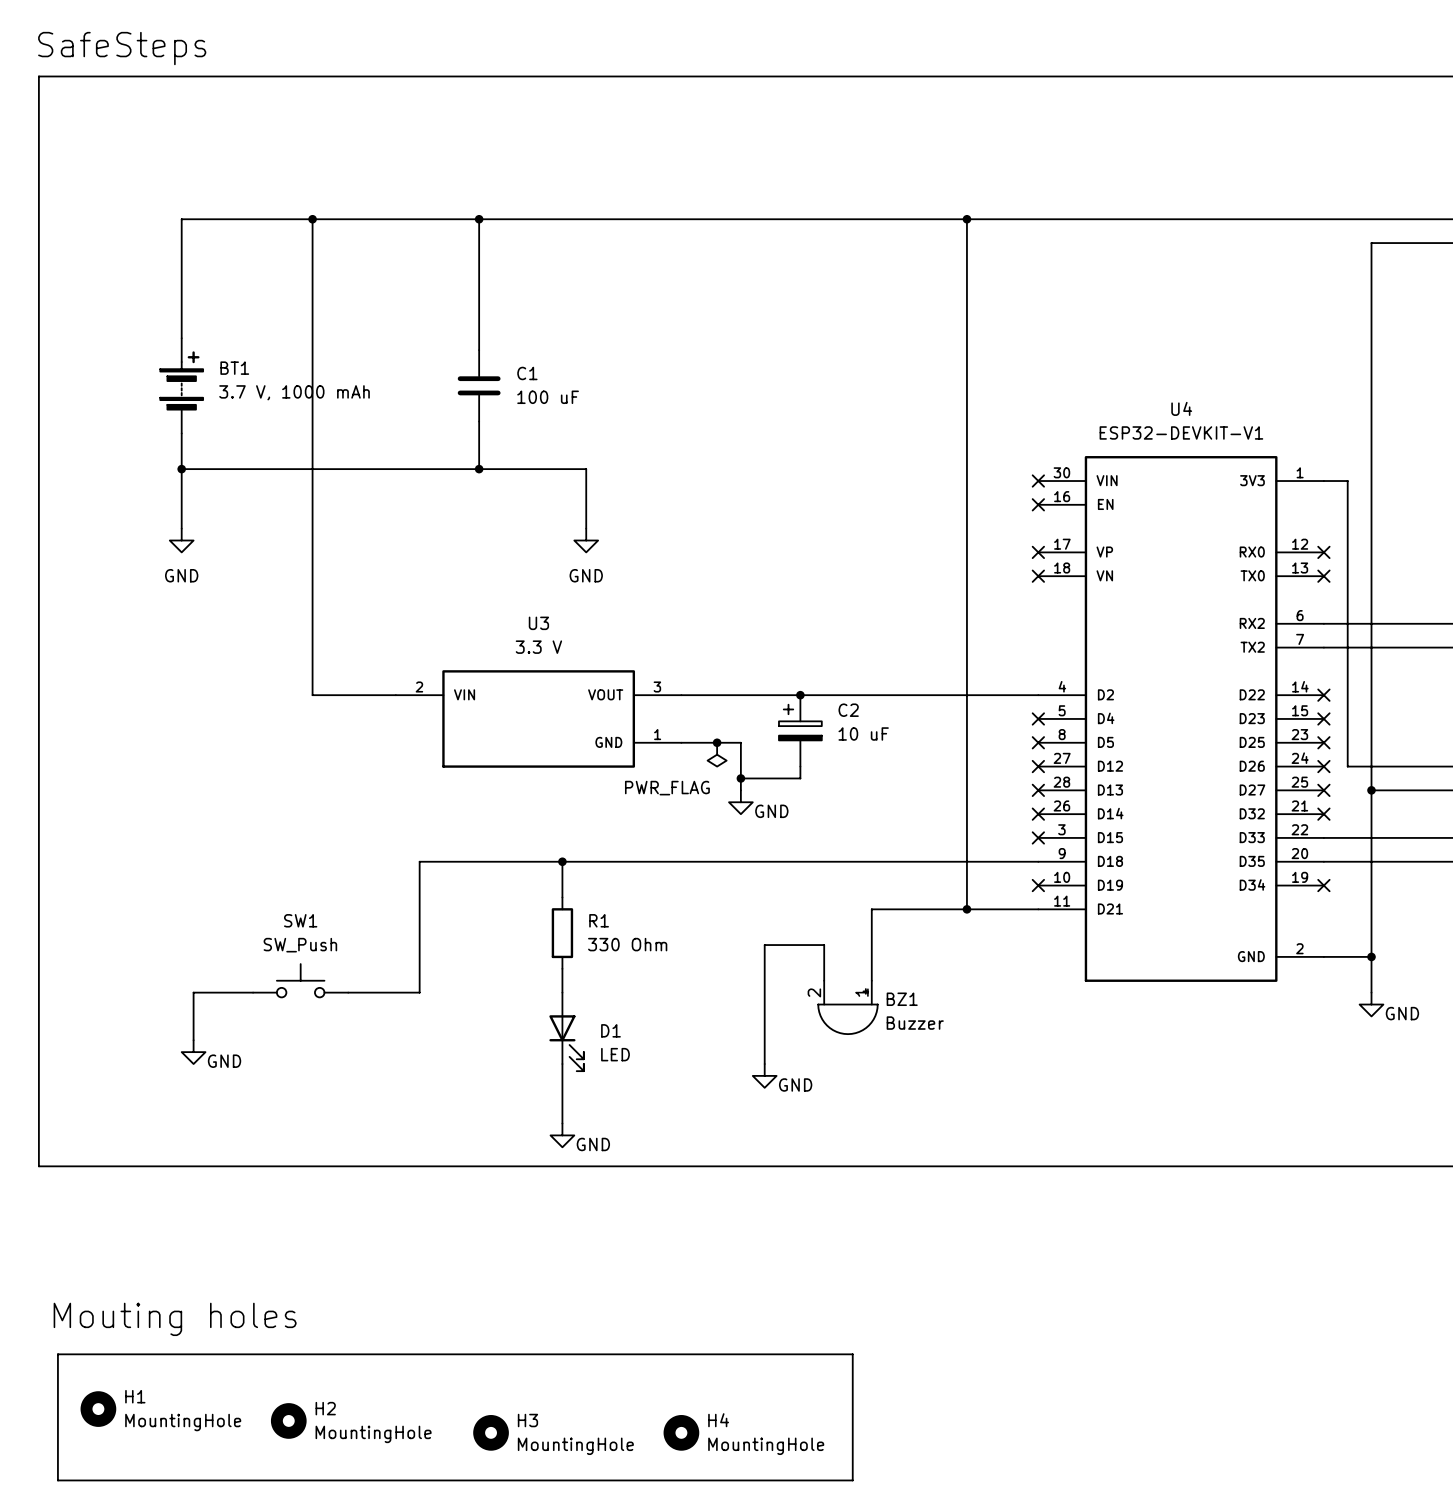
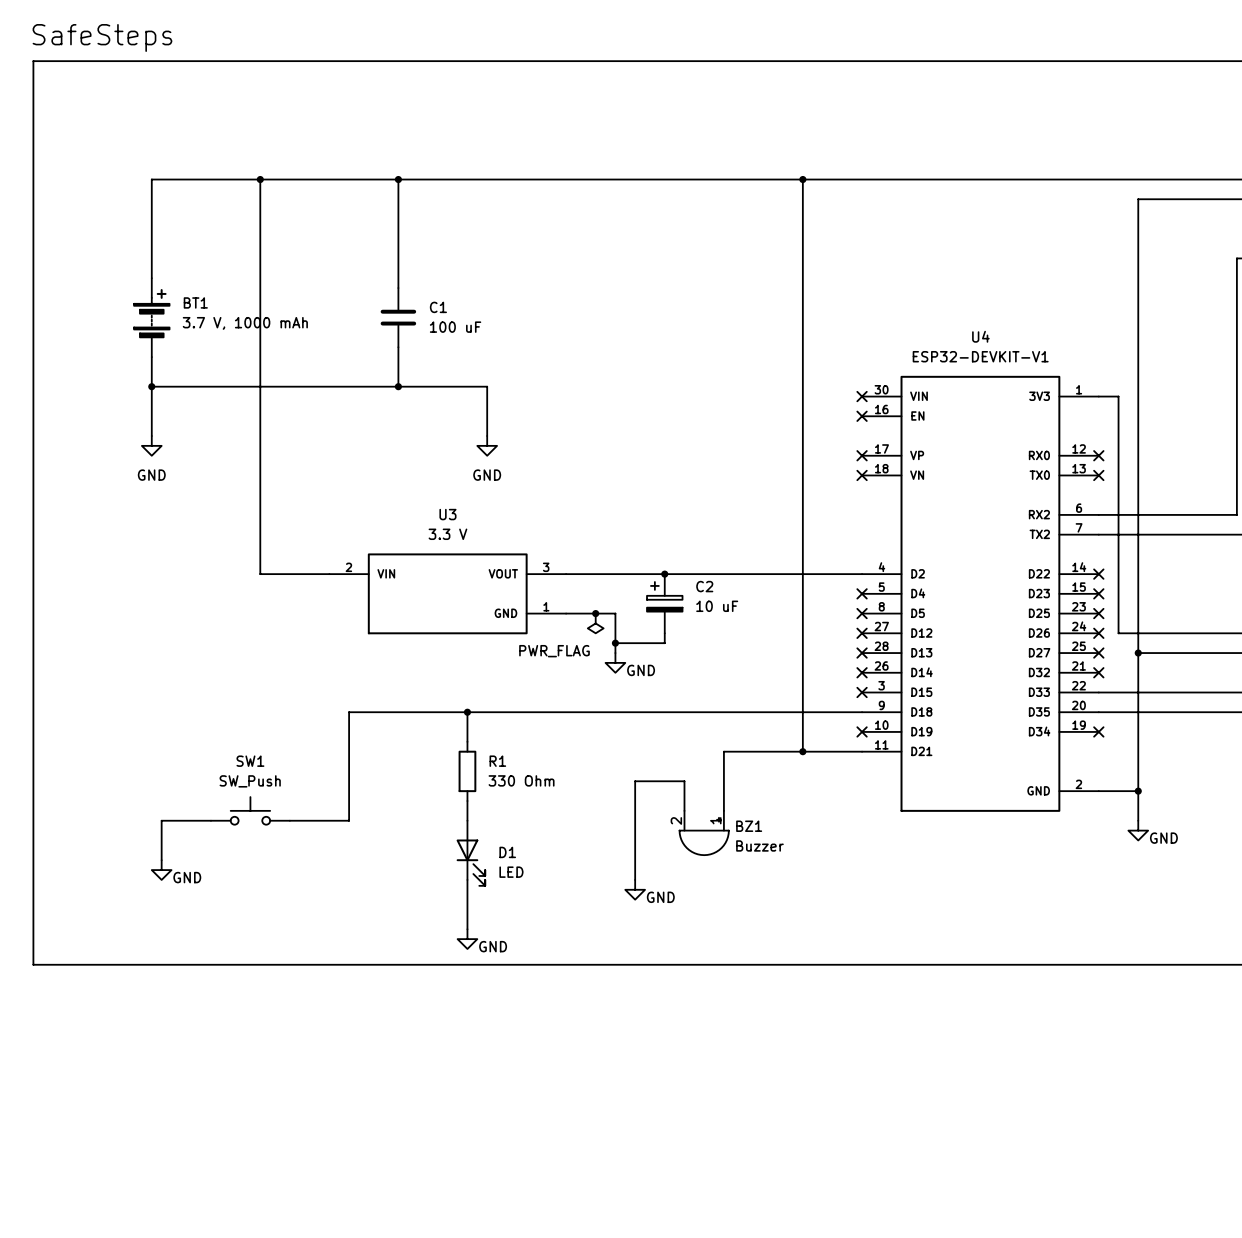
text: Mouting holes (175, 1319) -> none
line: (57, 1354) (852, 1354) (852, 1480) (57, 1480) (57, 1354) -> none
H1: MountingHole (98, 1409) -> none
H2: MountingHole (288, 1420) -> none
H3: MountingHole (491, 1432) -> none
H4: MountingHole (681, 1432) -> none

